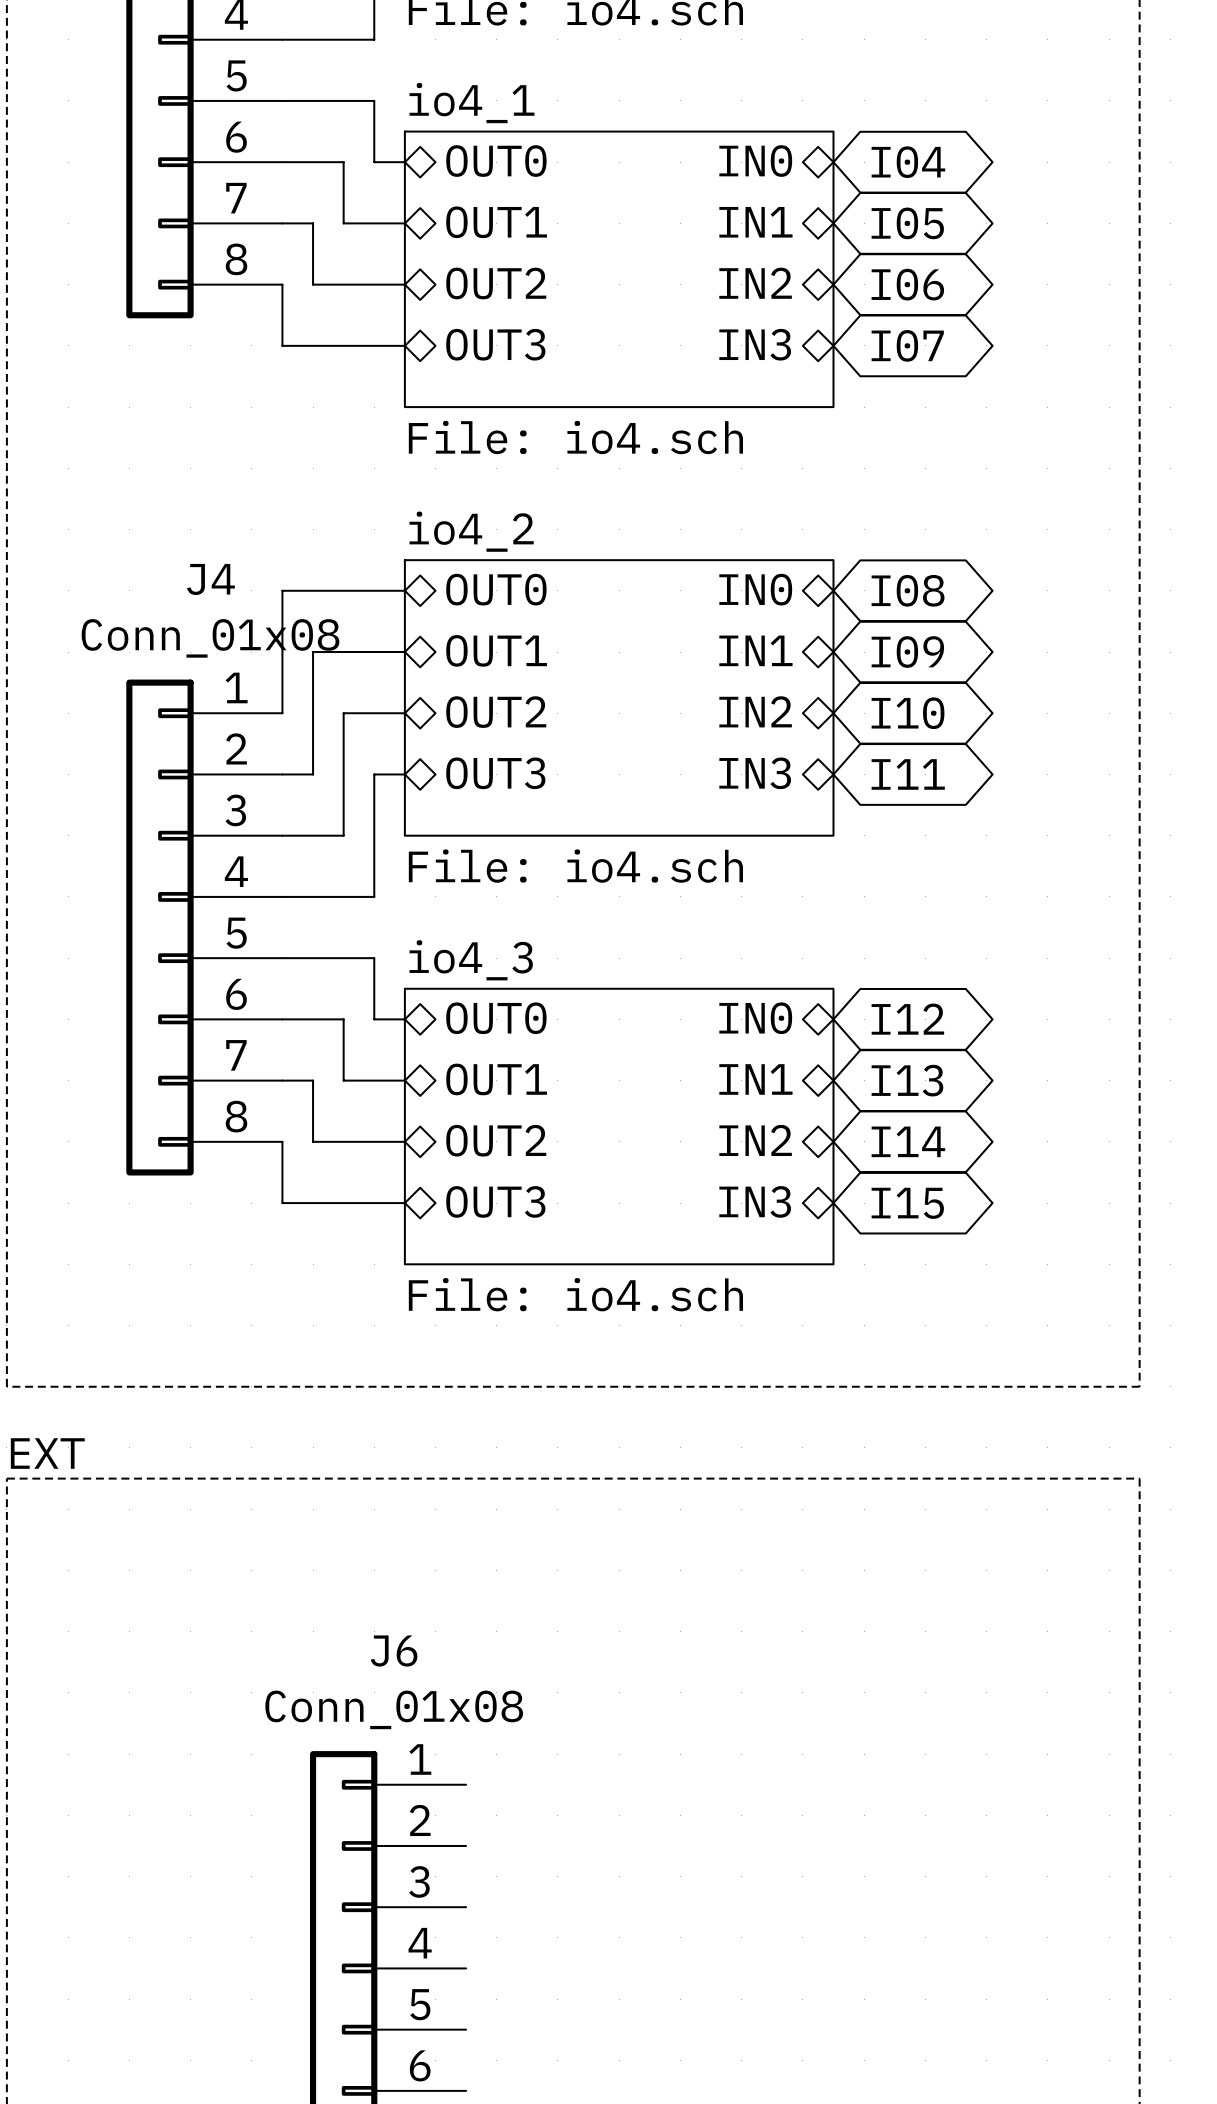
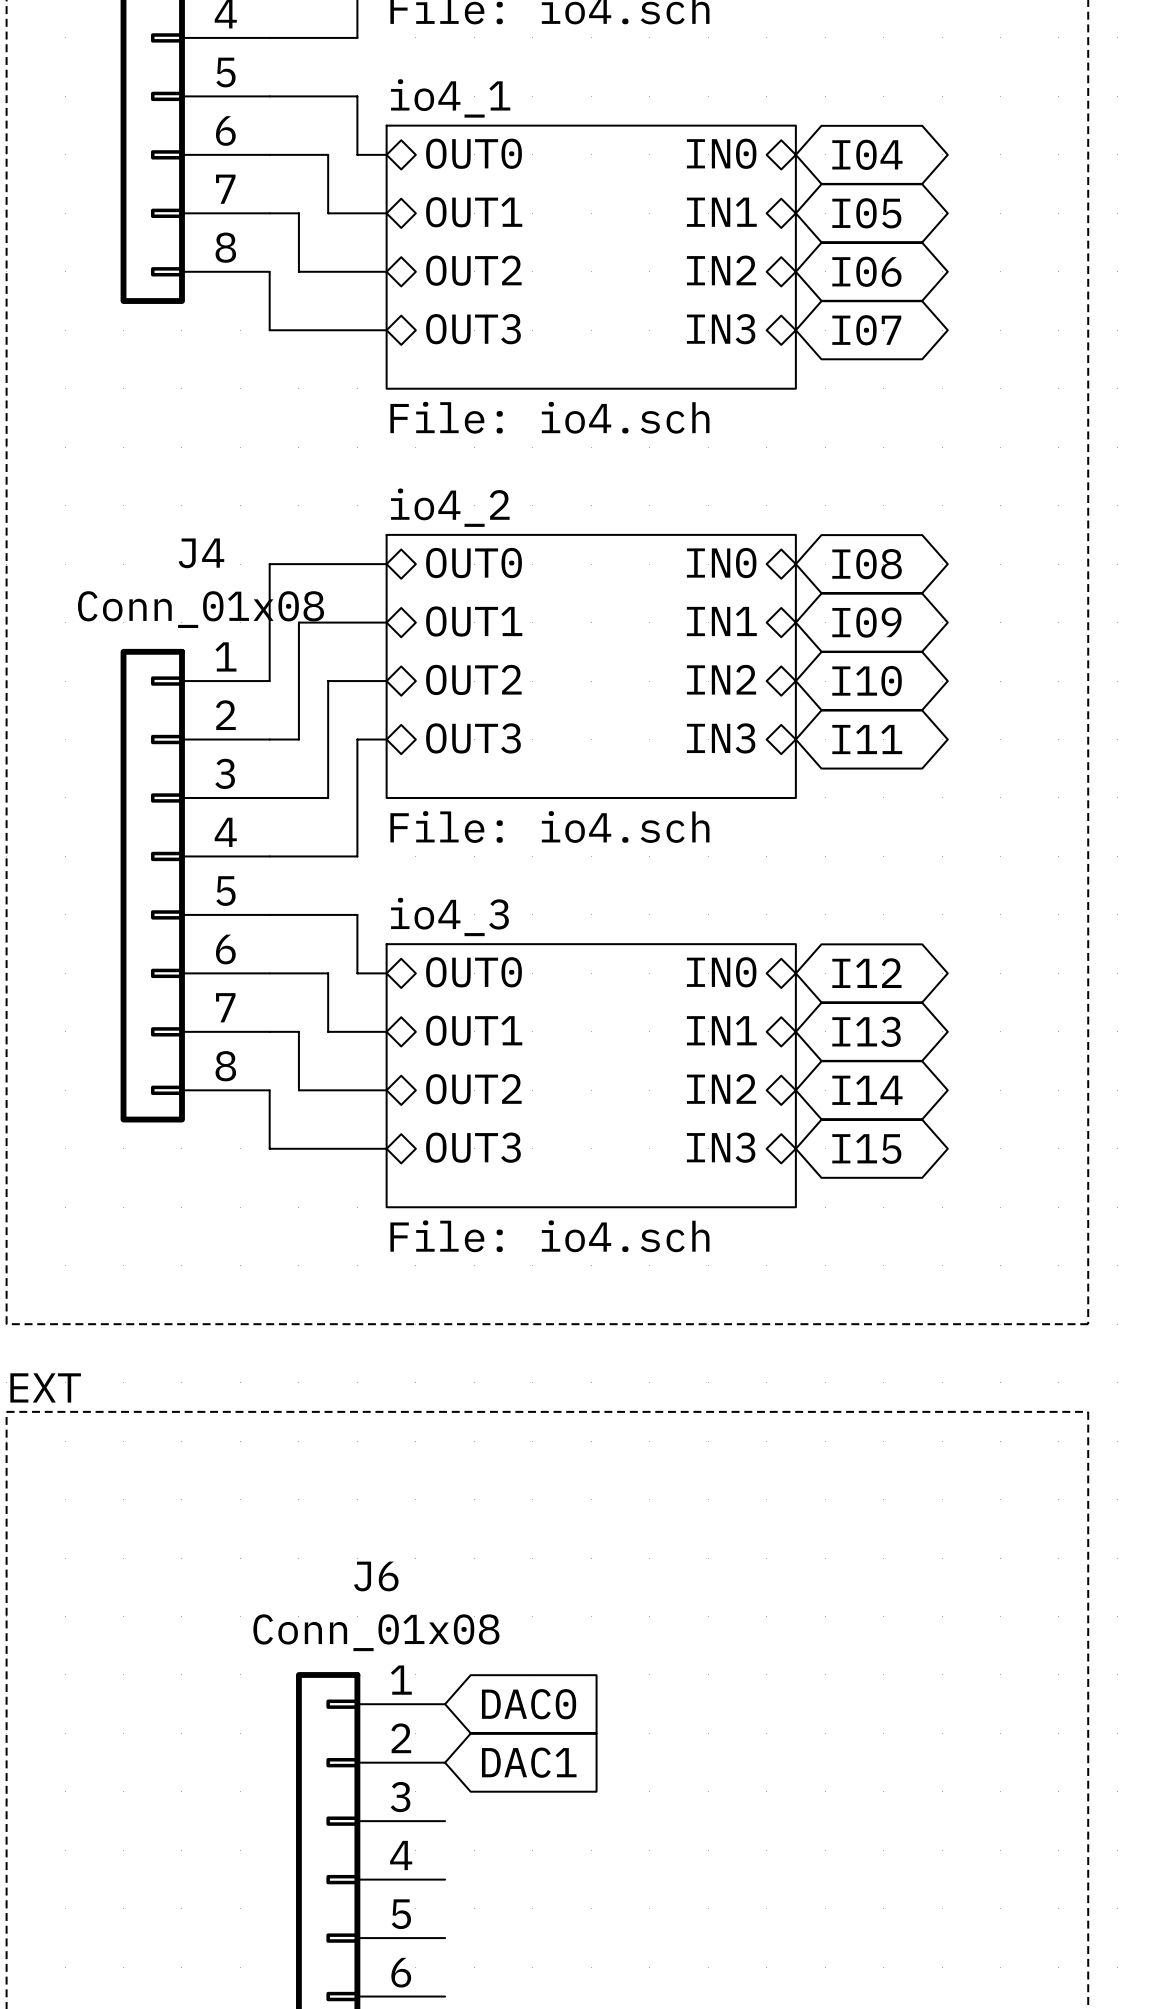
global label: none -> DAC0 (529, 1704)
global label: none -> DAC1 (529, 1762)

